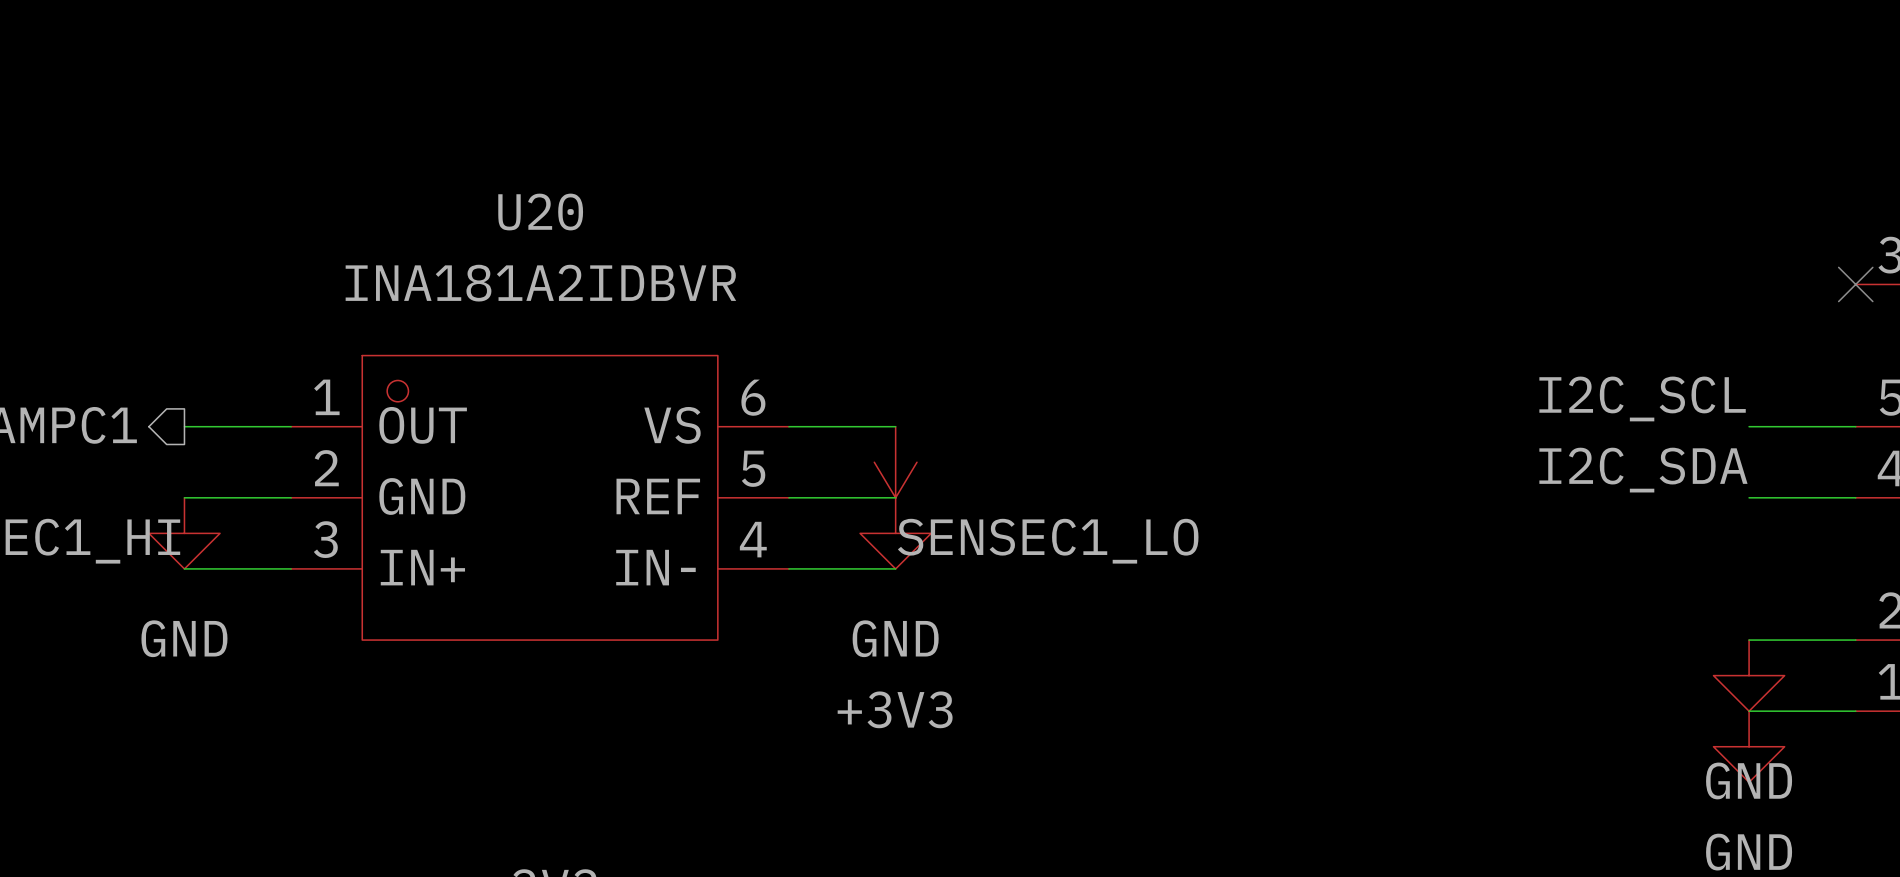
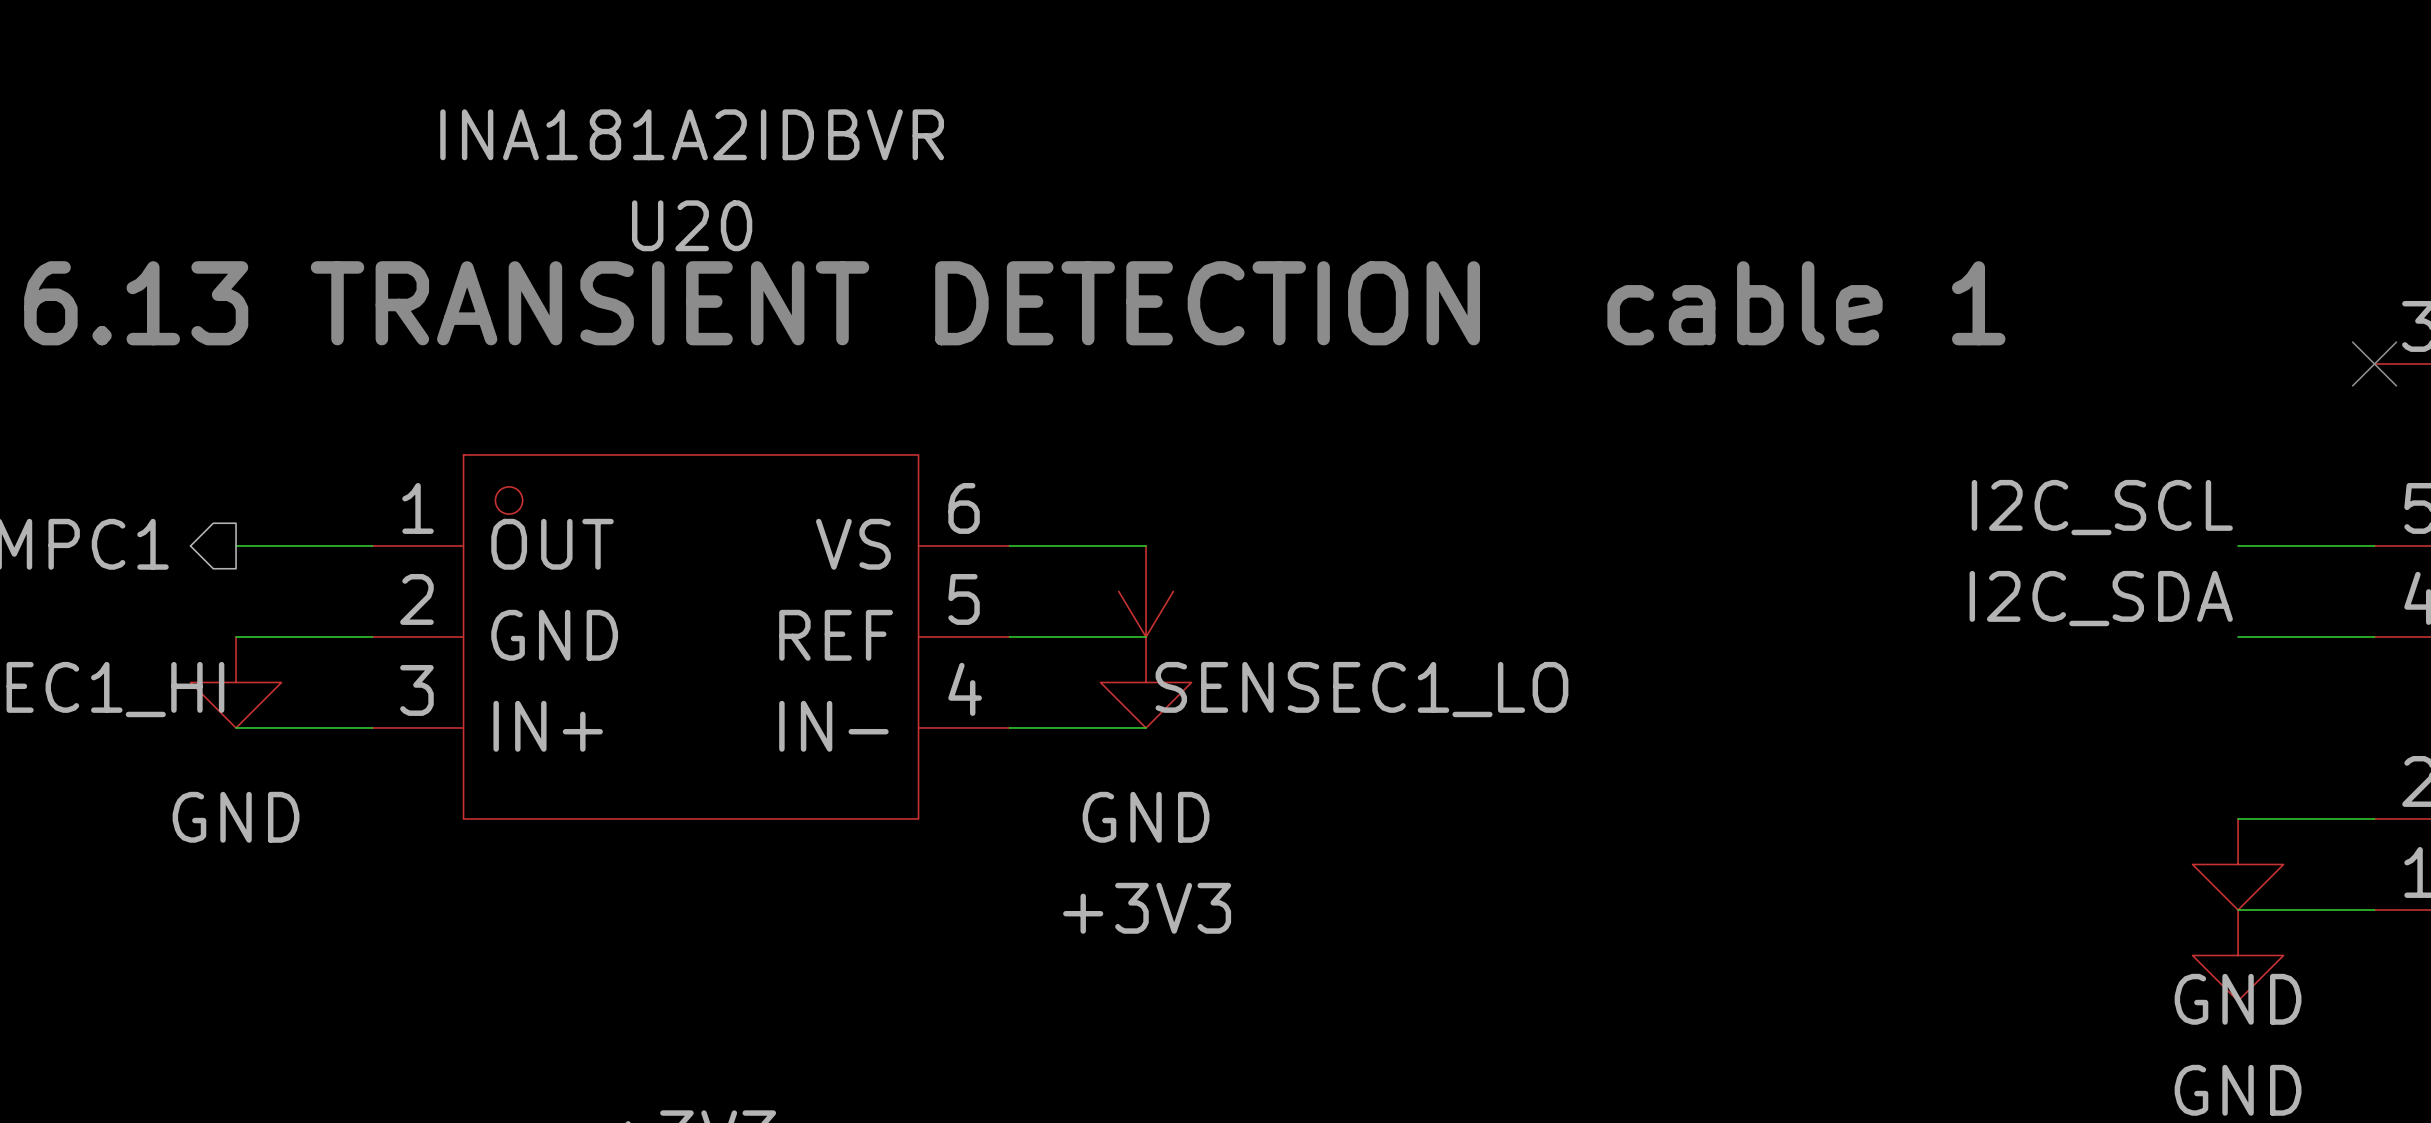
U20 name position: U20 (540, 212) -> U20 (692, 225)
text: none -> 6.13 TRANSIENT DETECTION cable 1 (1014, 303)
U20 value position: INA181A2IDBVR (540, 283) -> INA181A2IDBVR (692, 134)

